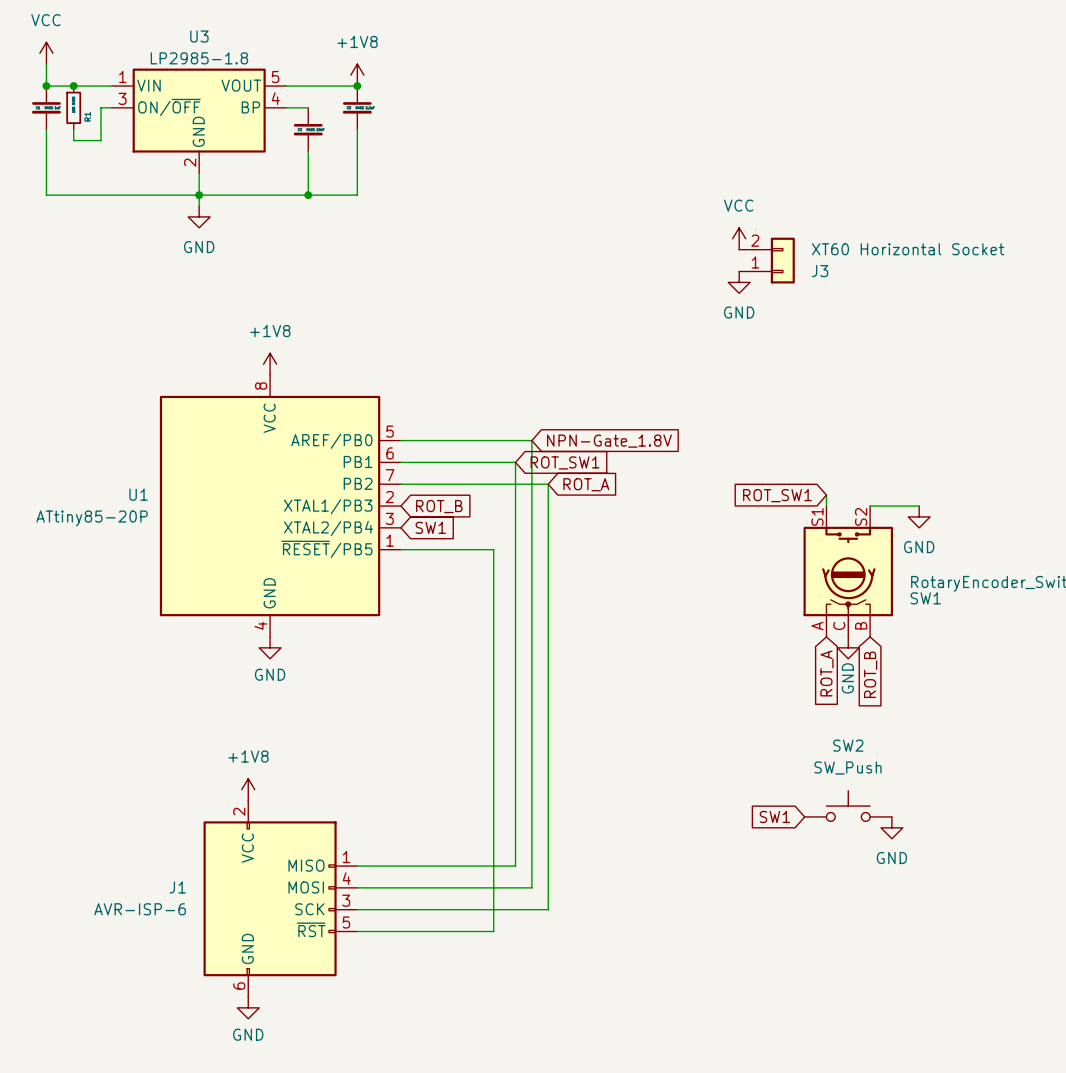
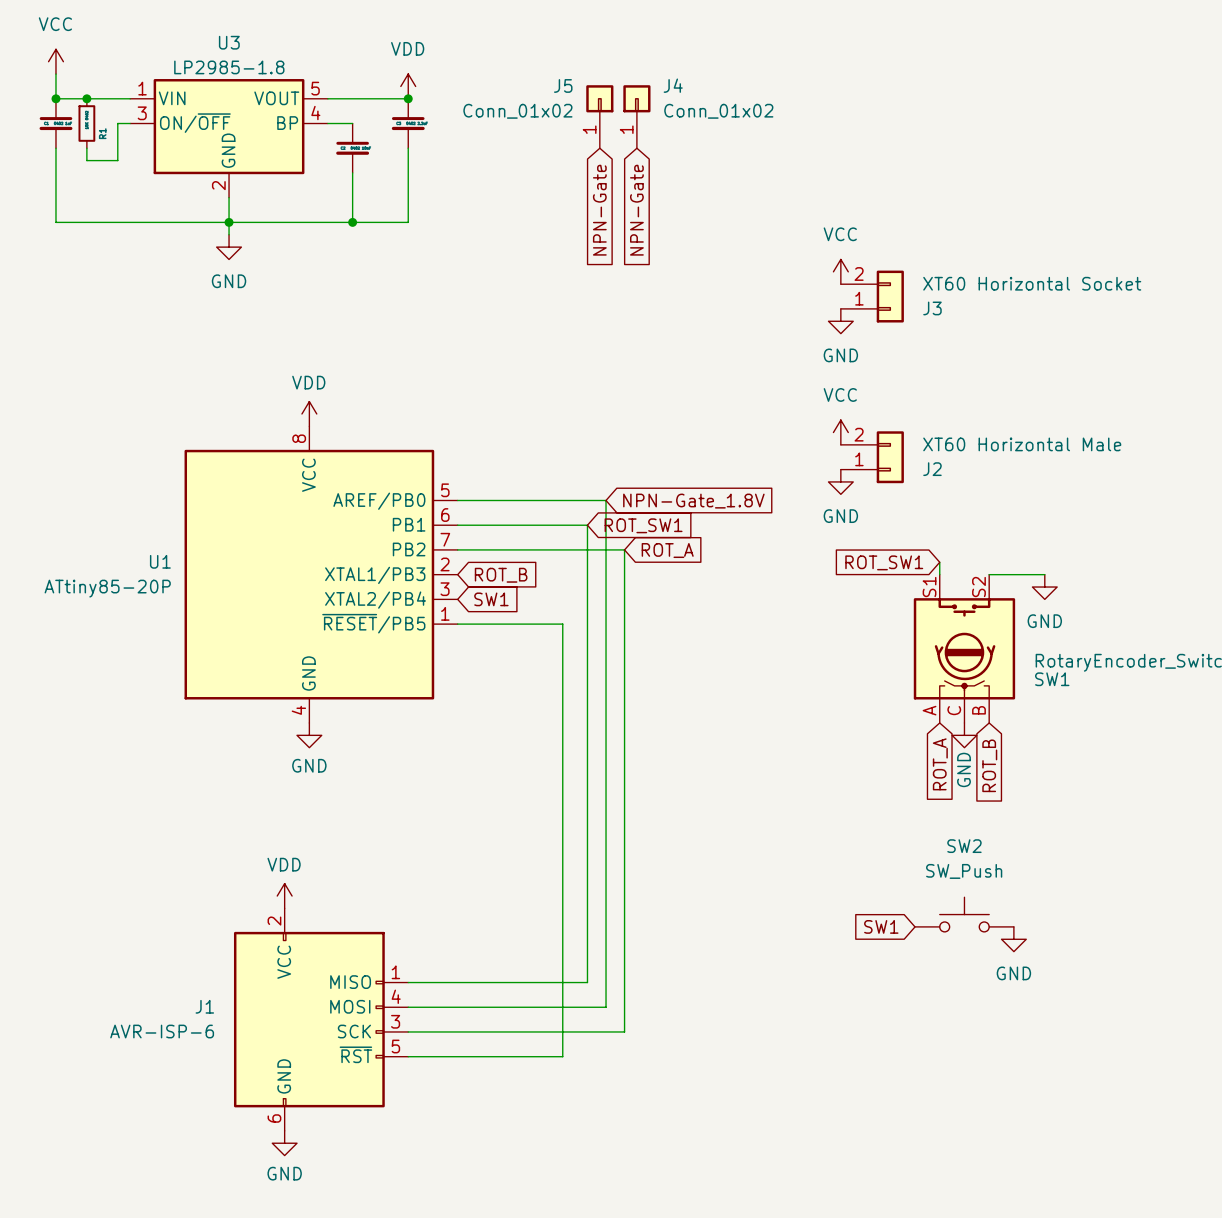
power symbol: +1V8 (357, 75) -> VDD (408, 86)
J5: none -> Conn_01x02 (599, 116)
J4: none -> Conn_01x02 (636, 116)
global label: none -> NPN-Gate (599, 210)
global label: none -> NPN-Gate (636, 210)
power symbol: +1V8 (270, 364) -> VDD (309, 413)
power symbol: none -> VCC (840, 432)
J2: none -> XT60 Horizontal Male (872, 457)
power symbol: none -> GND (840, 481)
power symbol: +1V8 (248, 789) -> VDD (284, 896)

